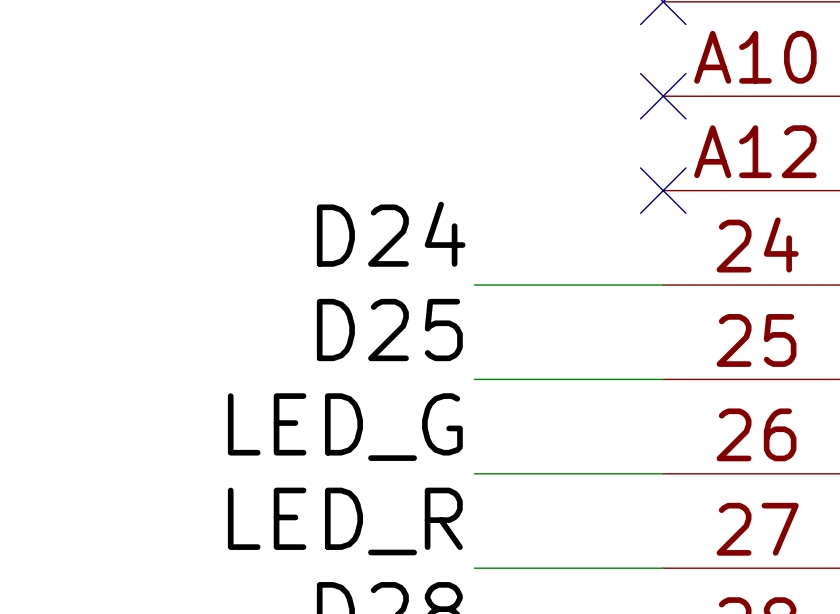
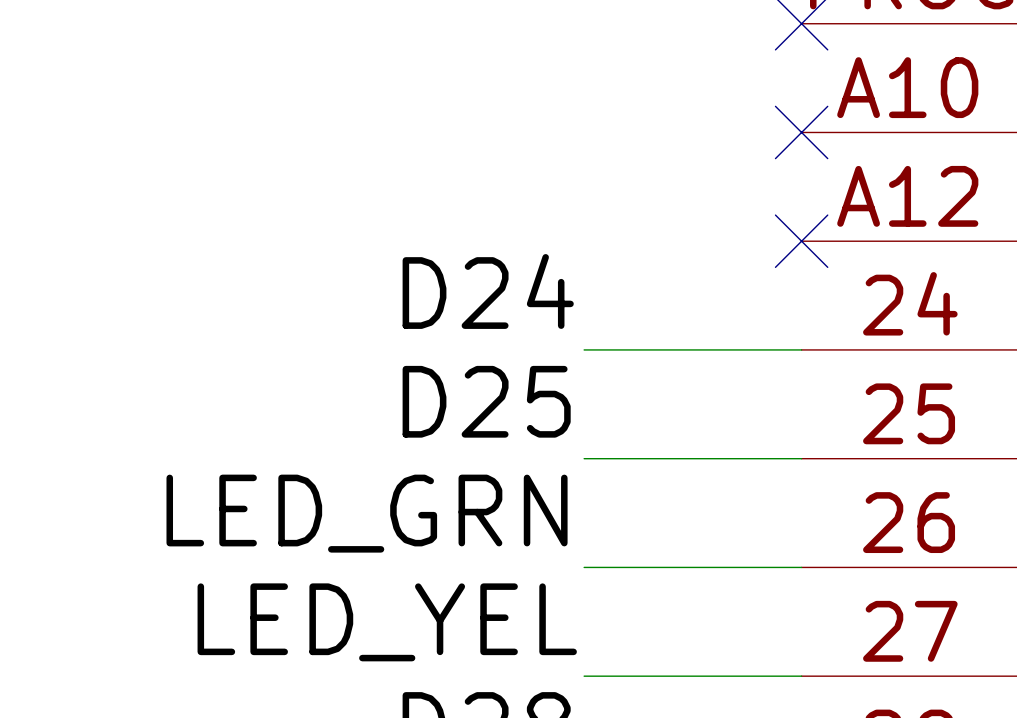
label: LED_G (345, 427) -> LED_GRN (367, 513)
label: LED_R (345, 521) -> LED_YEL (387, 622)

